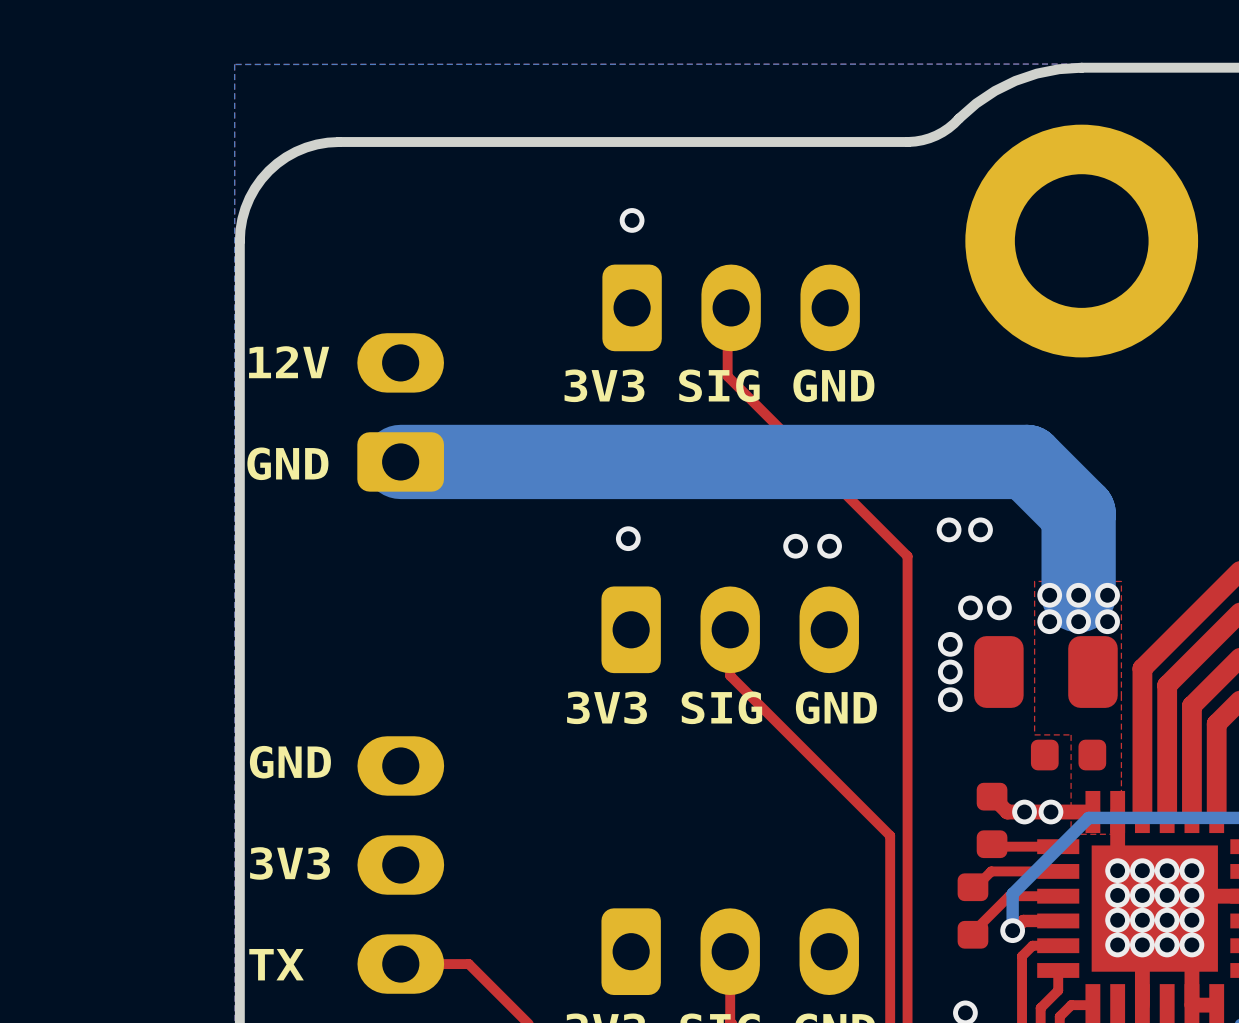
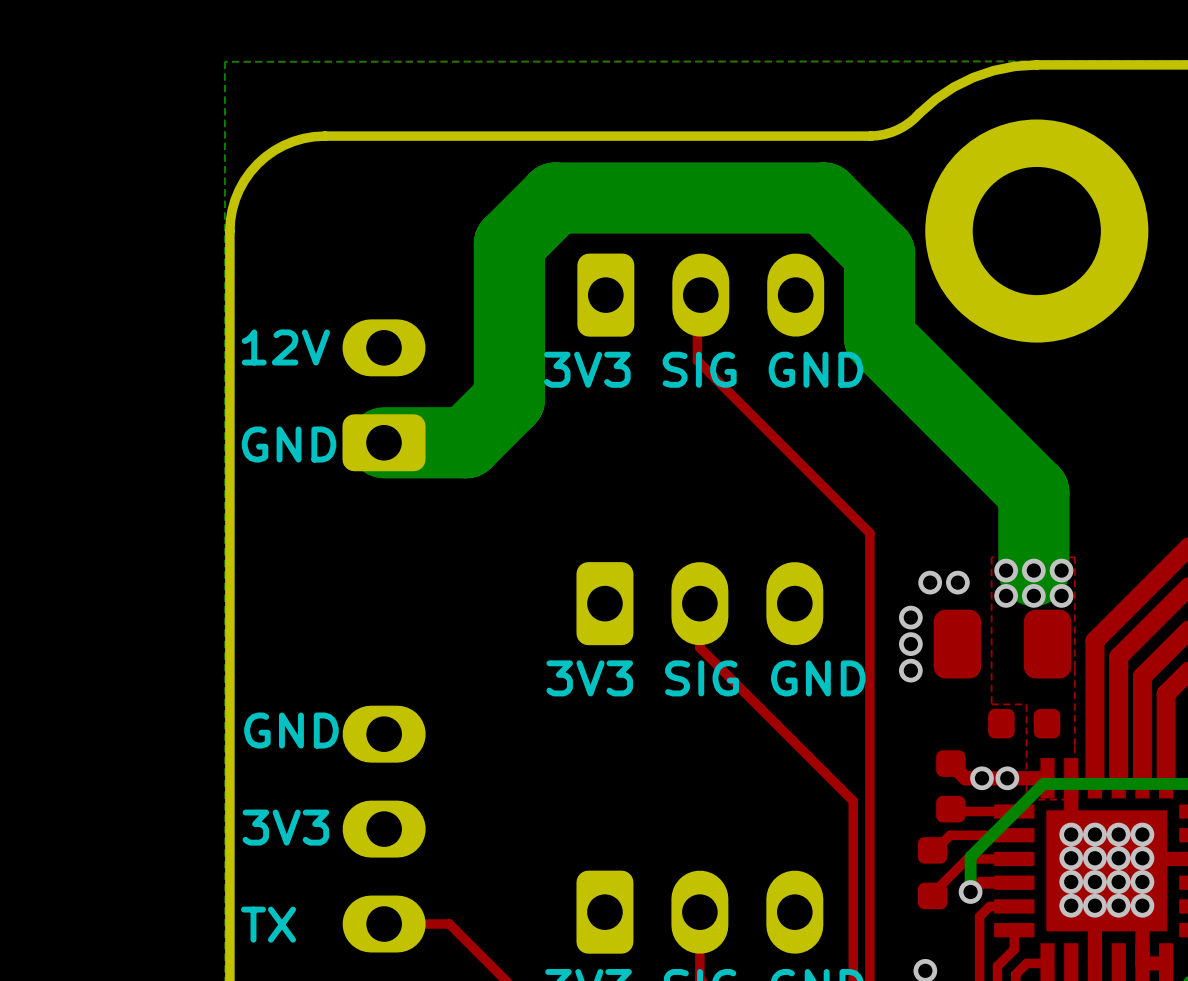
via: (632, 220) -> none
bottom track: (1027, 461) (486, 461) -> (984, 442) (879, 337) (879, 253) (824, 198) (555, 198) (509, 243) (509, 399) (465, 442)
via: (949, 529) -> none
via: (980, 529) -> none
via: (628, 538) -> none
via: (795, 546) -> none
via: (829, 546) -> none

